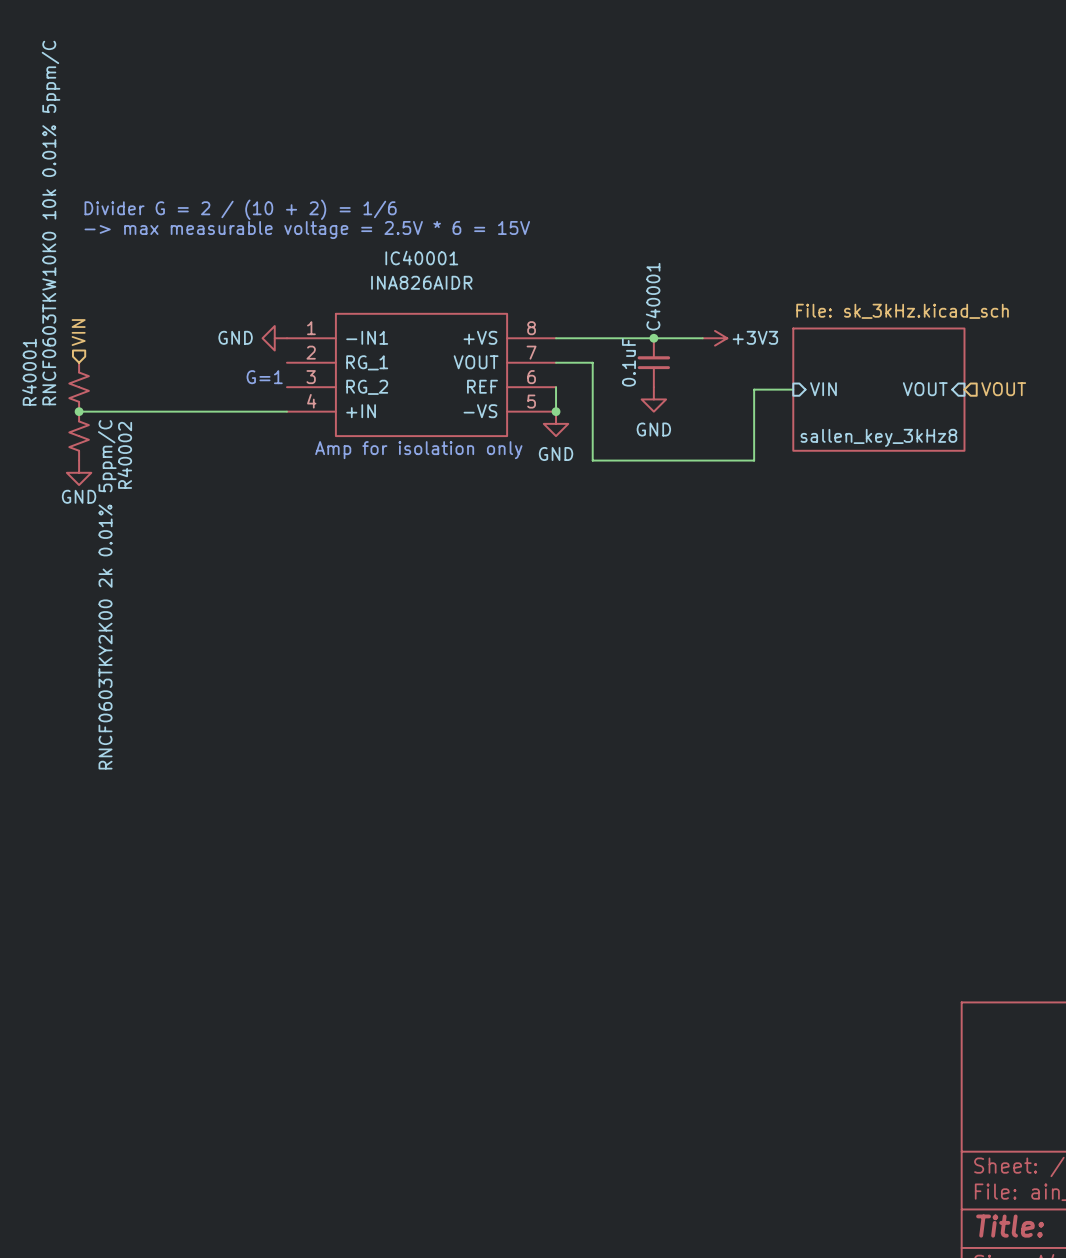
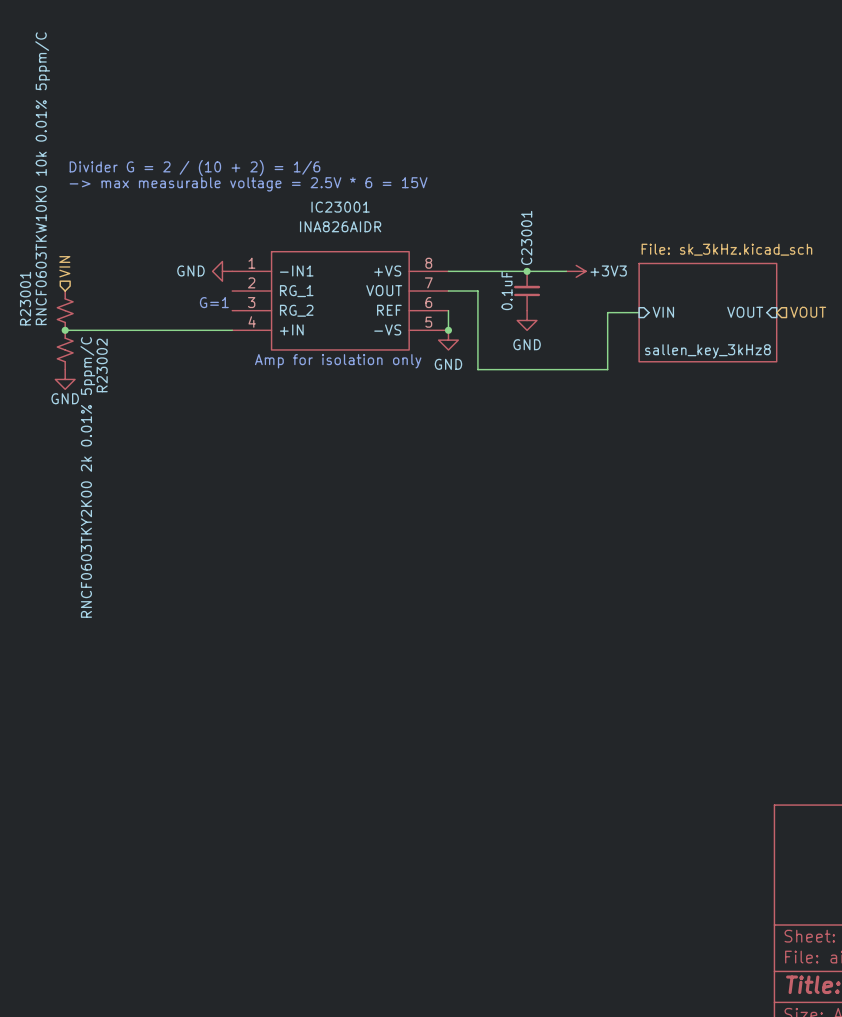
IC40001 name: IC40001 (421, 258) -> IC23001 (340, 207)
C40001 name: C40001 (653, 296) -> C23001 (526, 237)
R40001 name: R40001 (29, 372) -> R23001 (25, 298)
R40002 name: R40002 (124, 455) -> R23002 (102, 365)

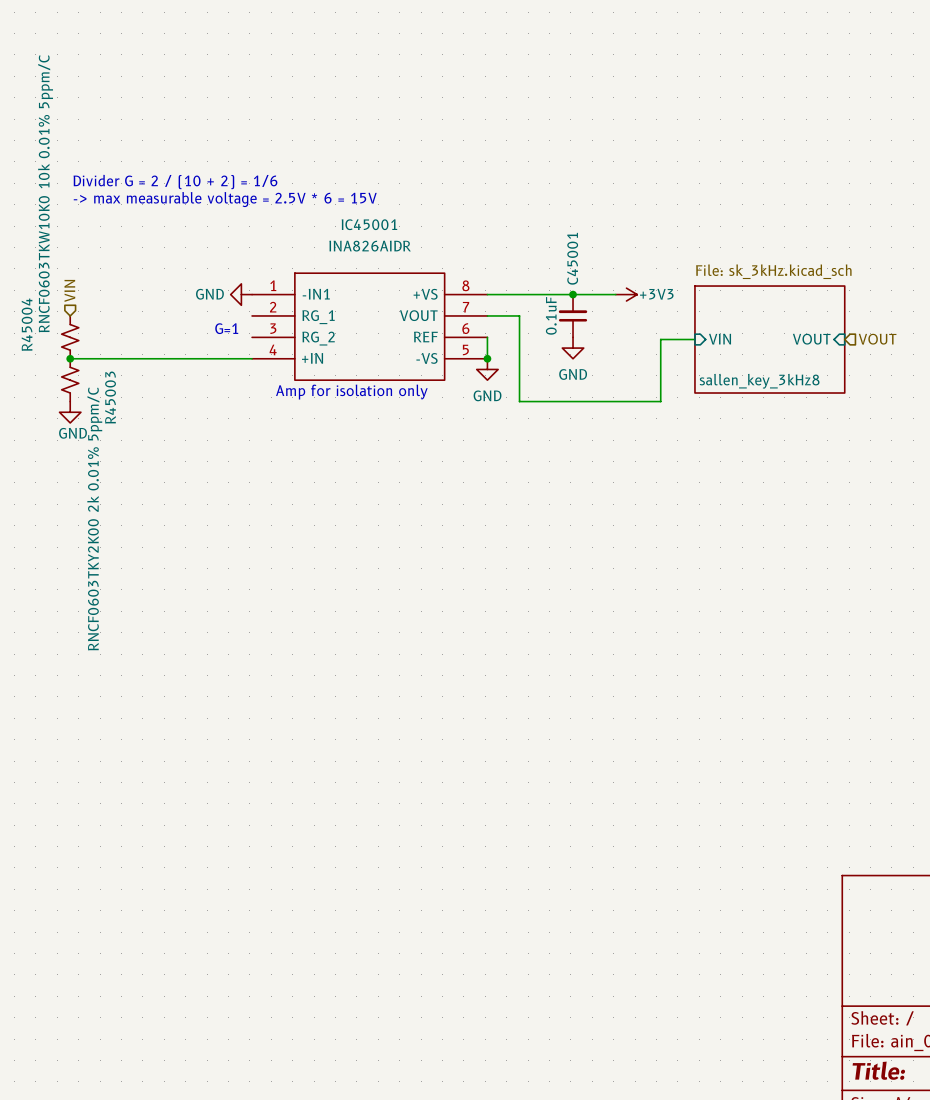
IC23001 name: IC23001 (340, 207) -> IC45001 (369, 224)
C23001 name: C23001 (526, 237) -> C45001 (572, 258)
R23001 name: R23001 (25, 298) -> R45004 (27, 324)
R23002 name: R23002 (102, 365) -> R45003 (110, 397)

